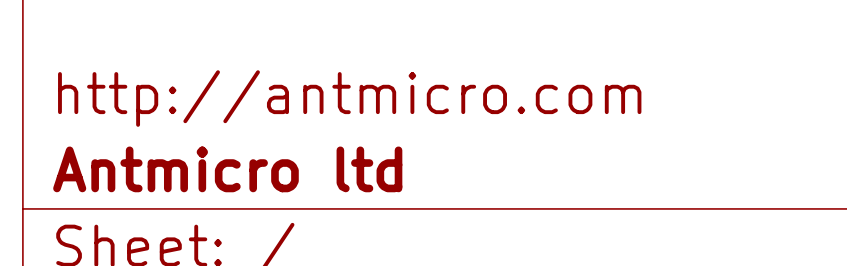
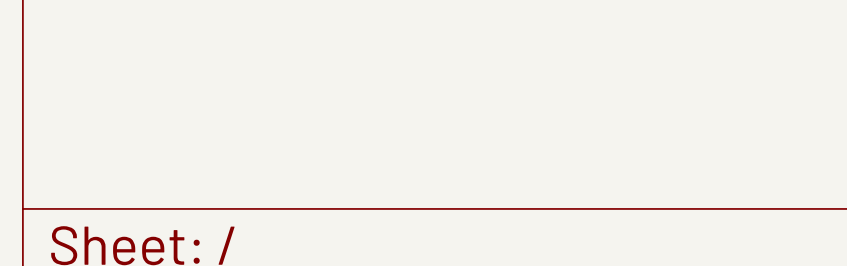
title block: http://antmicro.com (349, 98) -> none
title block: Antmicro ltd (227, 169) -> none

